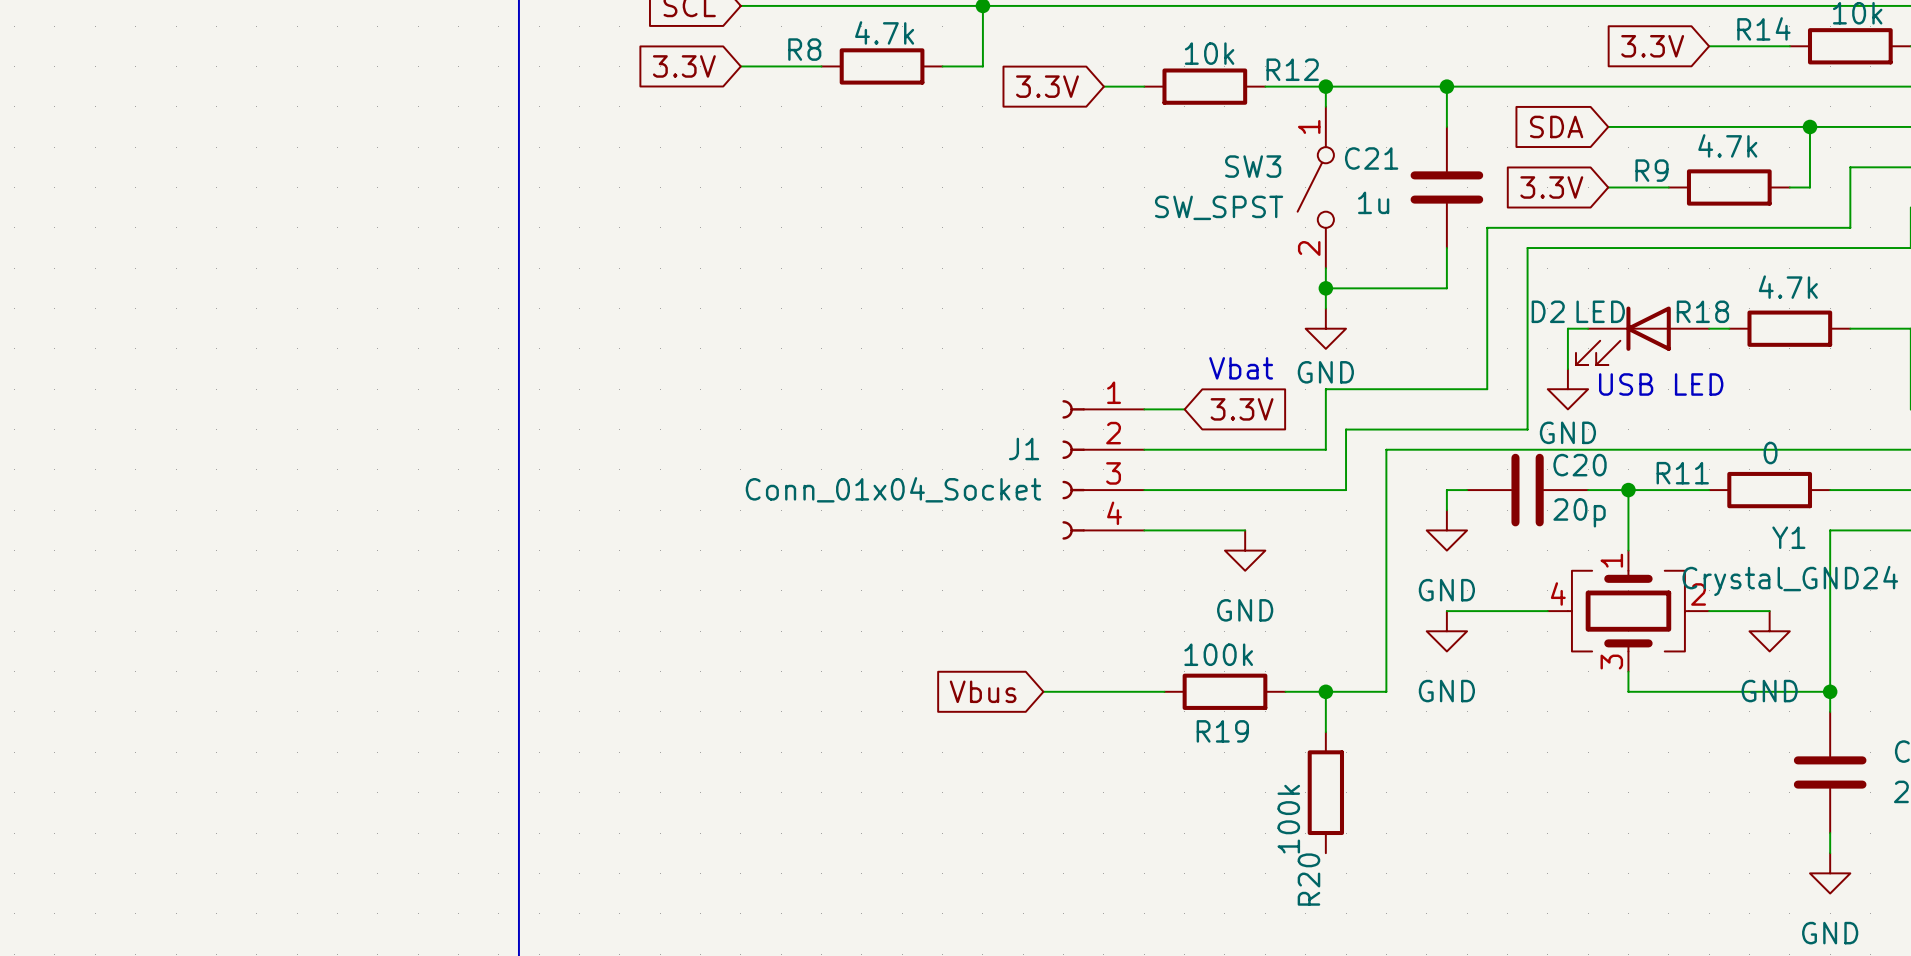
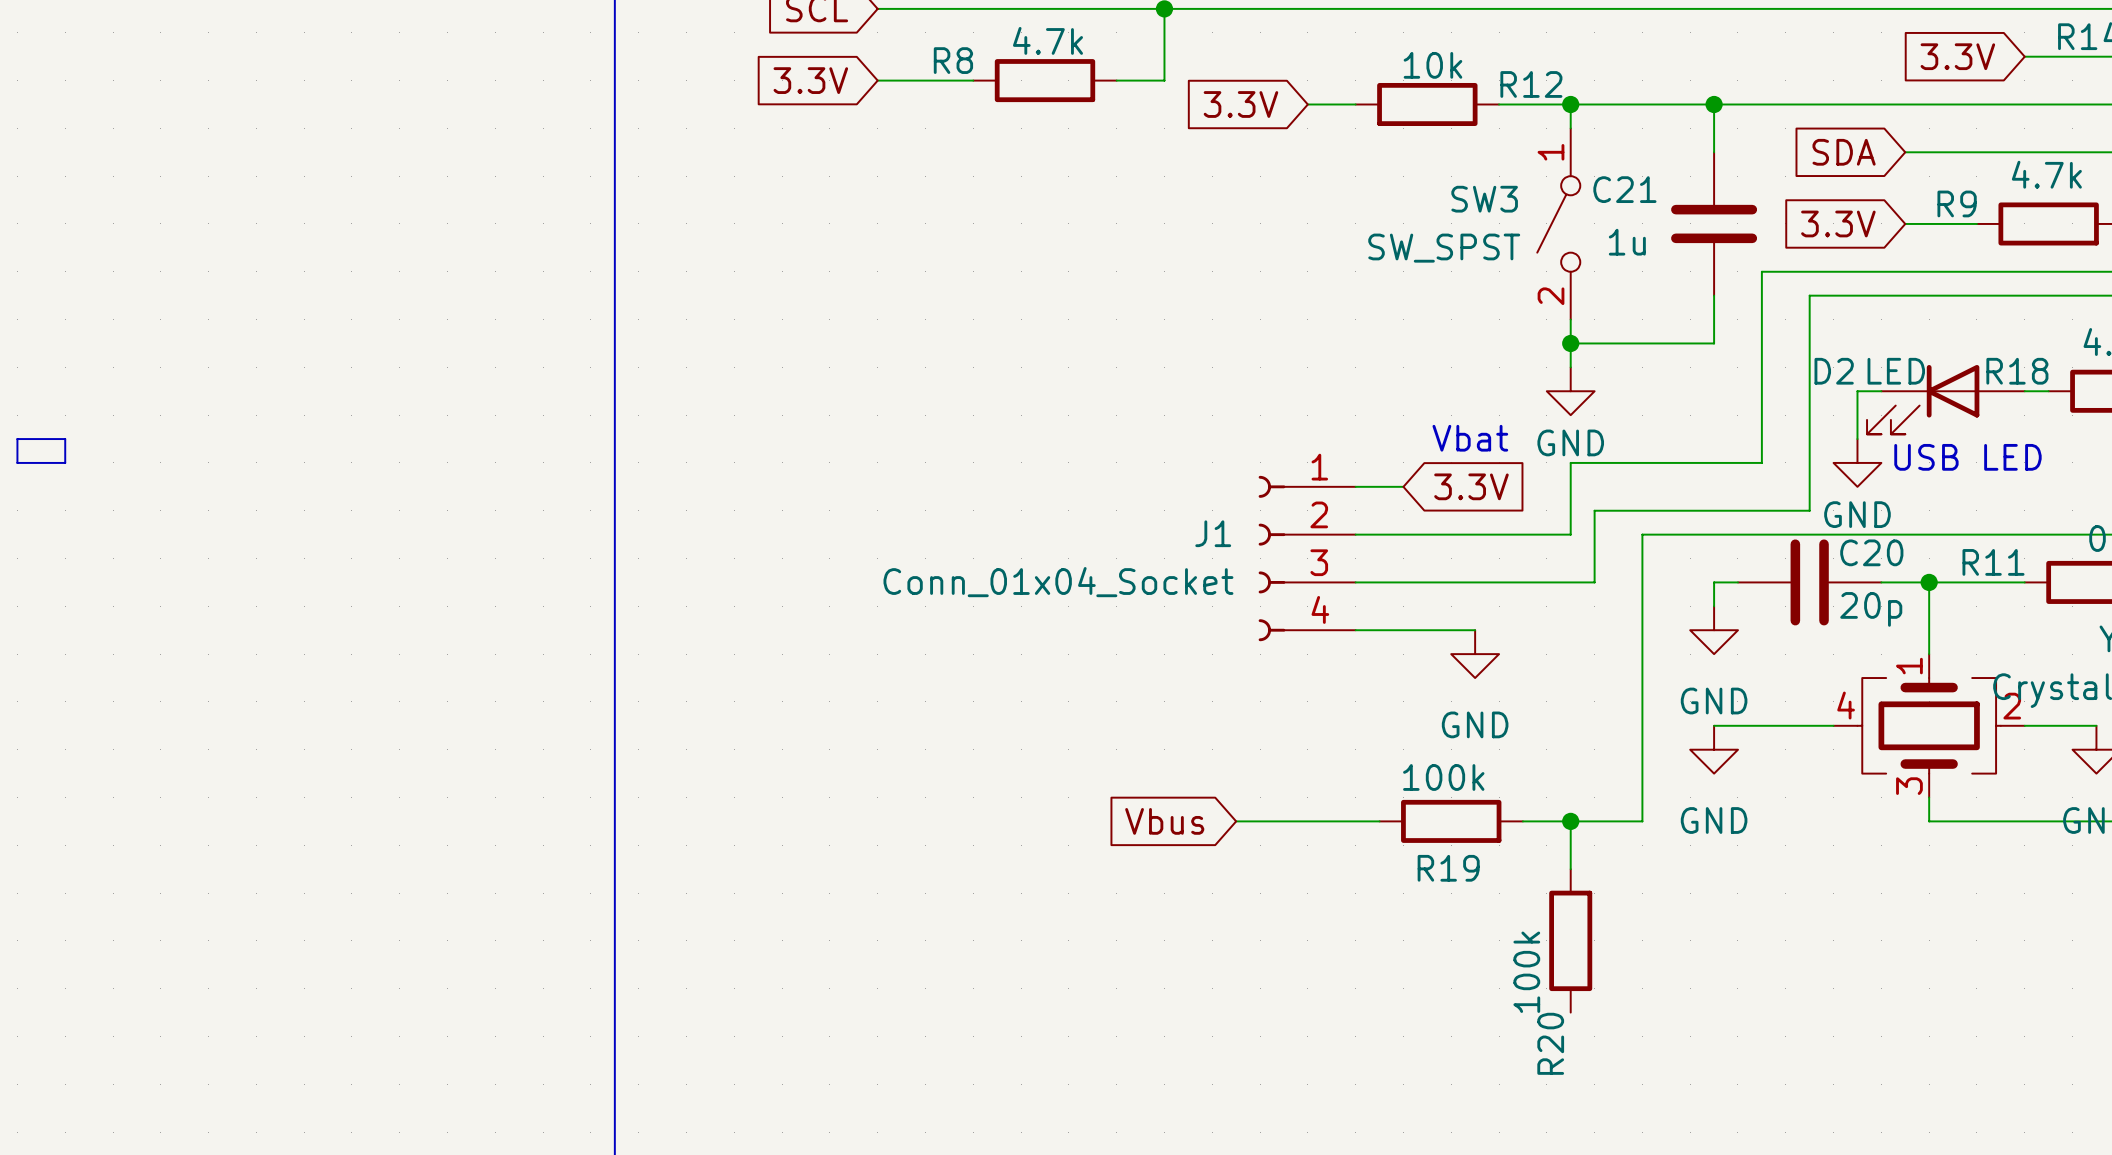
line: none -> (17, 439) (17, 462) (65, 462) (65, 439) (17, 439)

